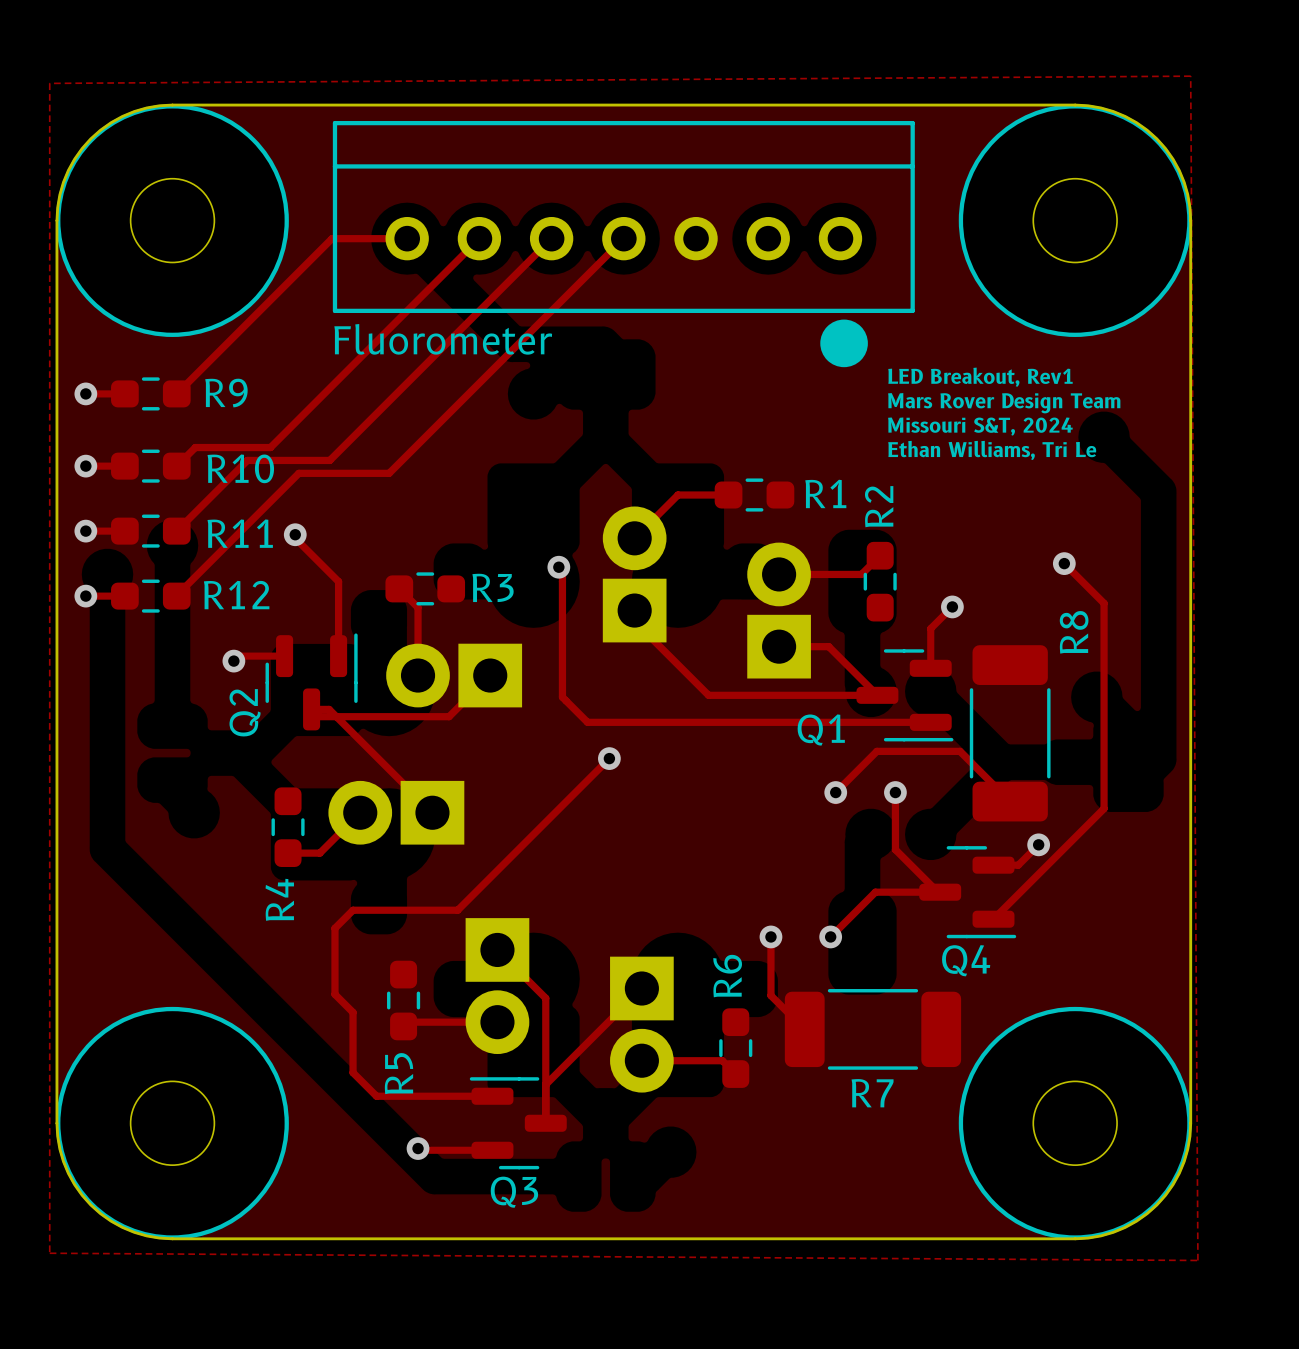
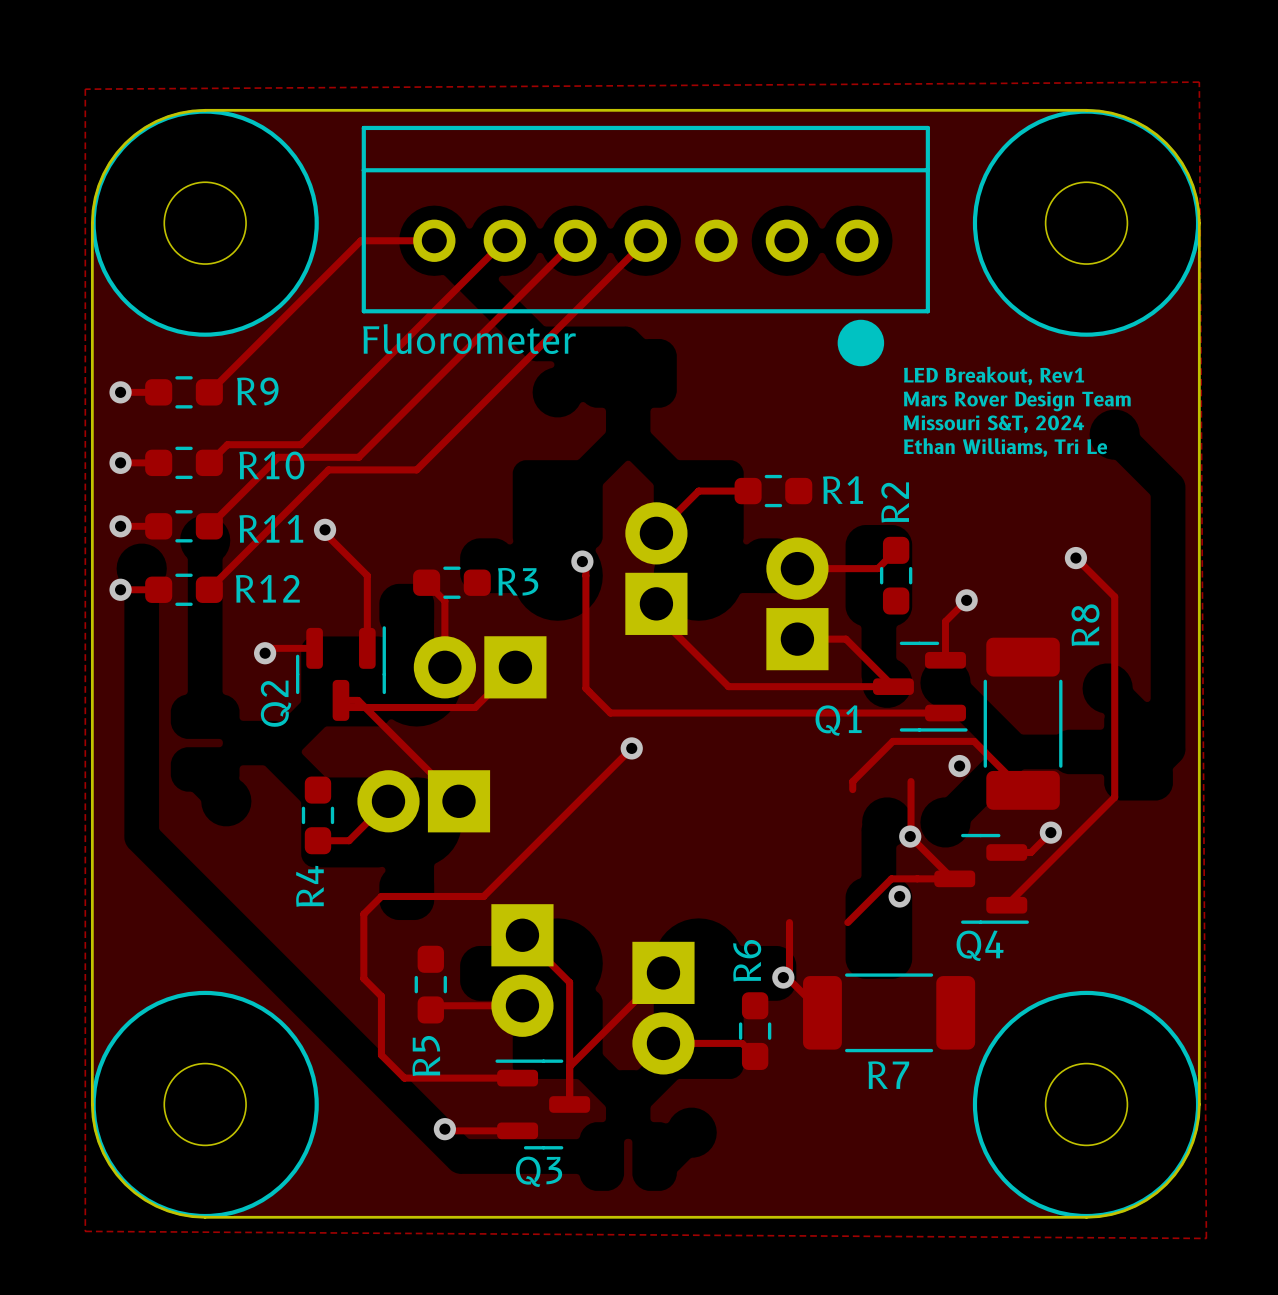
via: none -> (959, 766)
via: (835, 792) -> none
via: (895, 792) -> none
via: none -> (910, 836)
via: none -> (899, 896)
via: (770, 936) -> none
via: (830, 936) -> none
via: none -> (783, 977)

